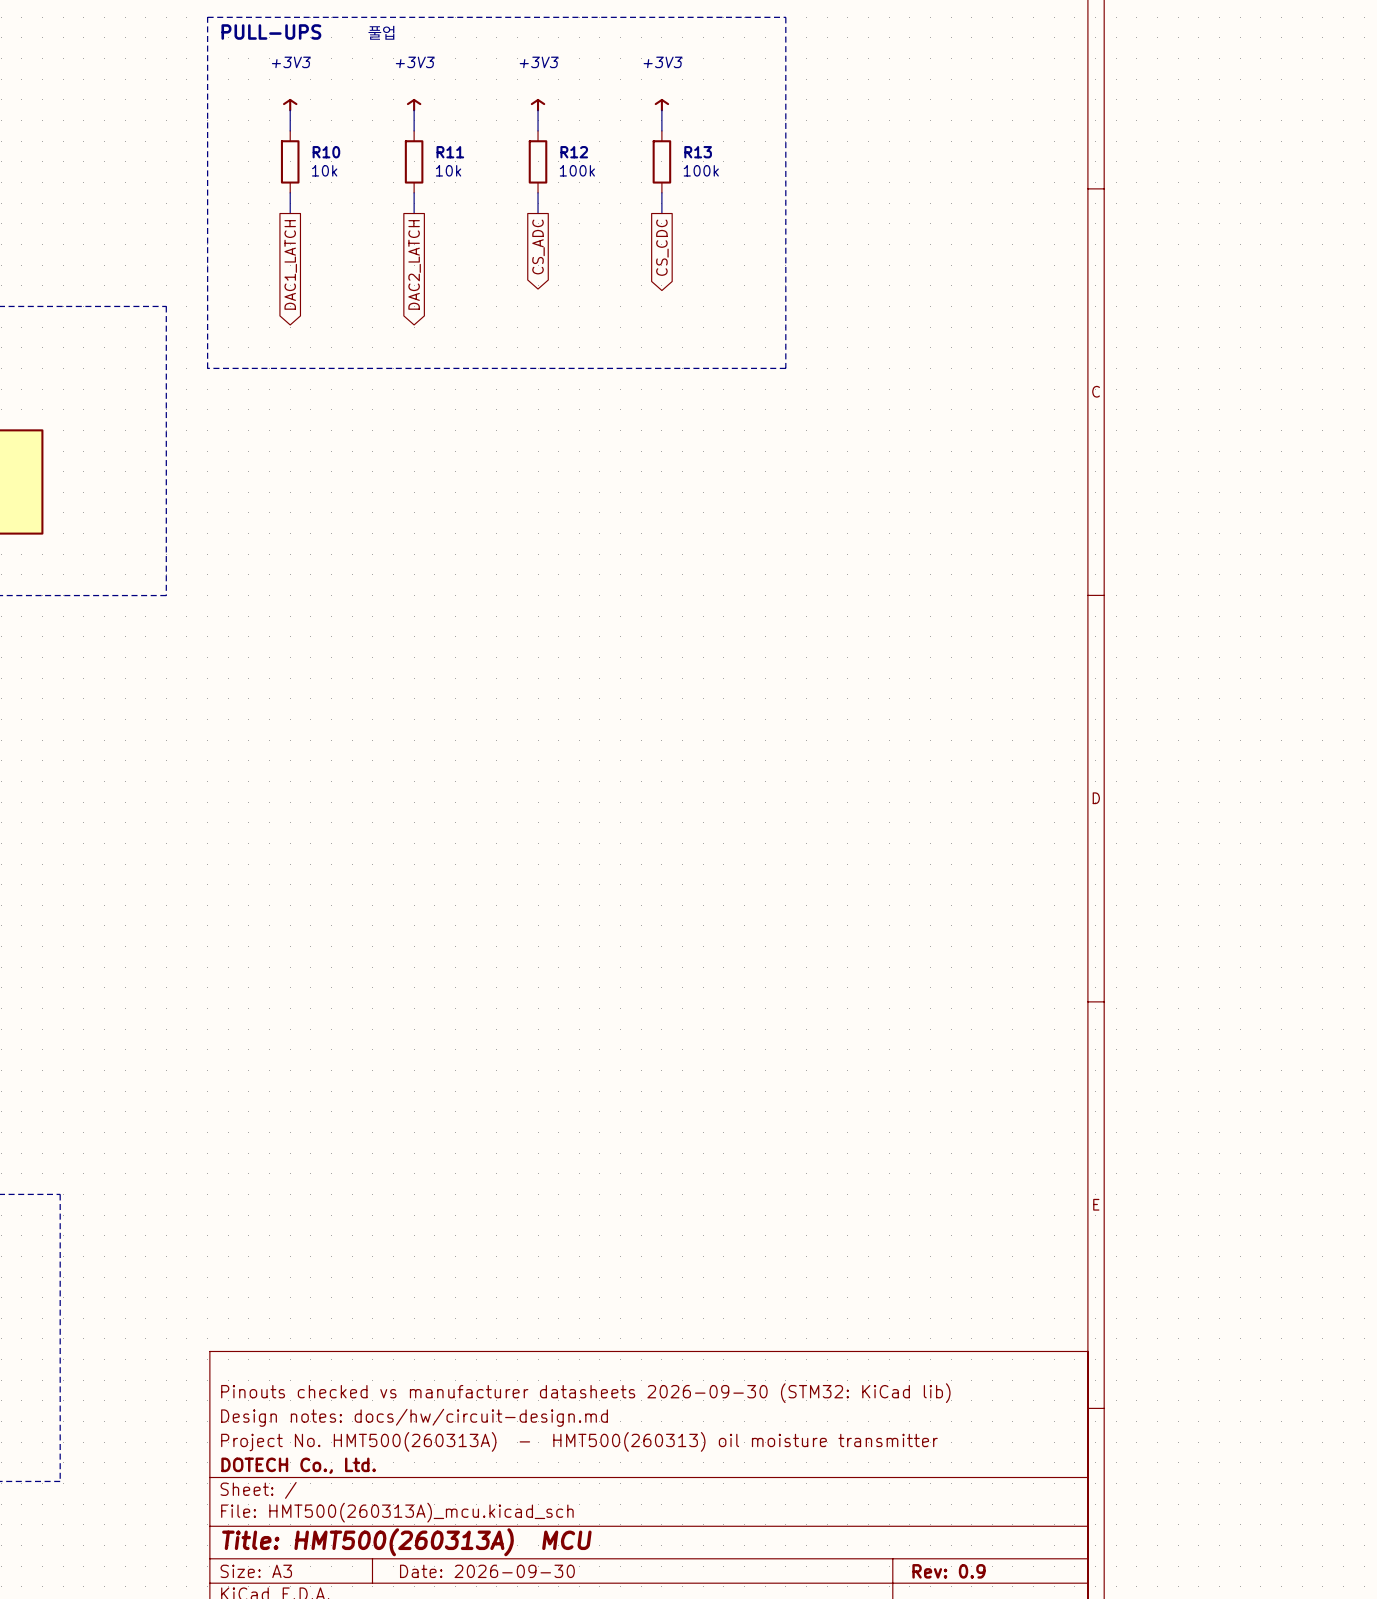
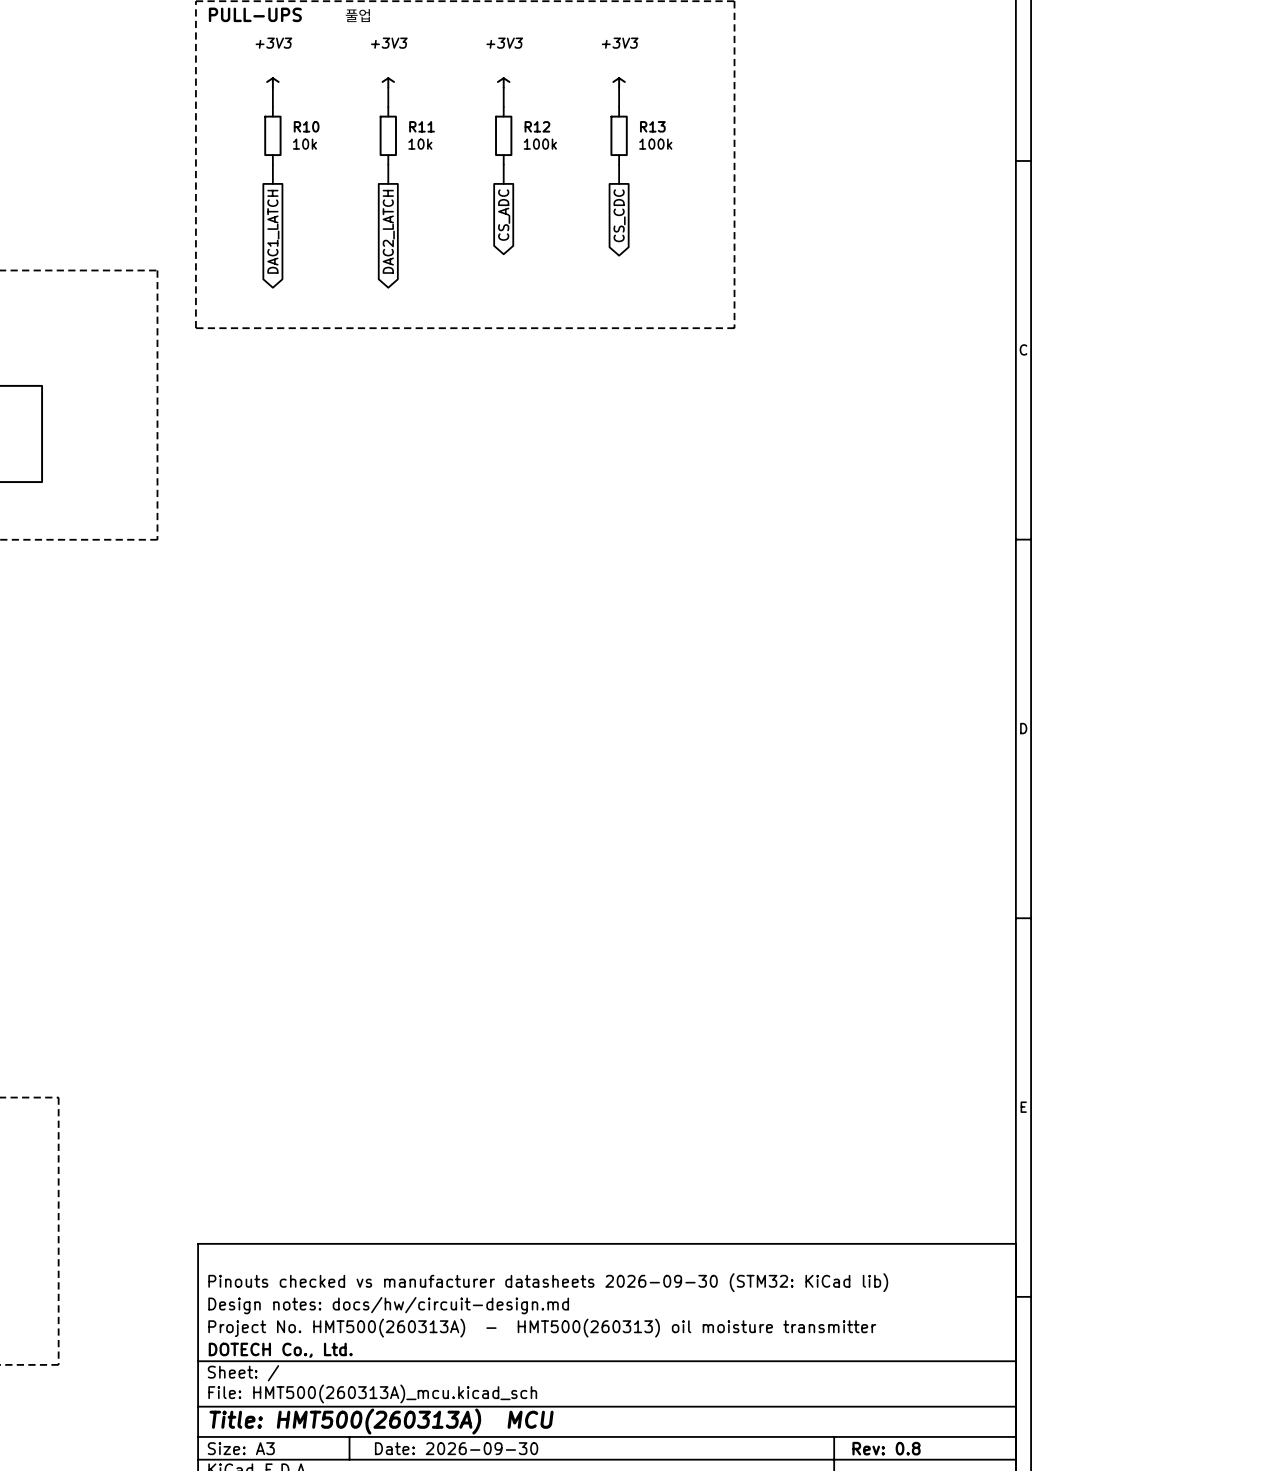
title block: Rev: 0.9 (949, 1571) -> Rev: 0.8 (886, 1448)

